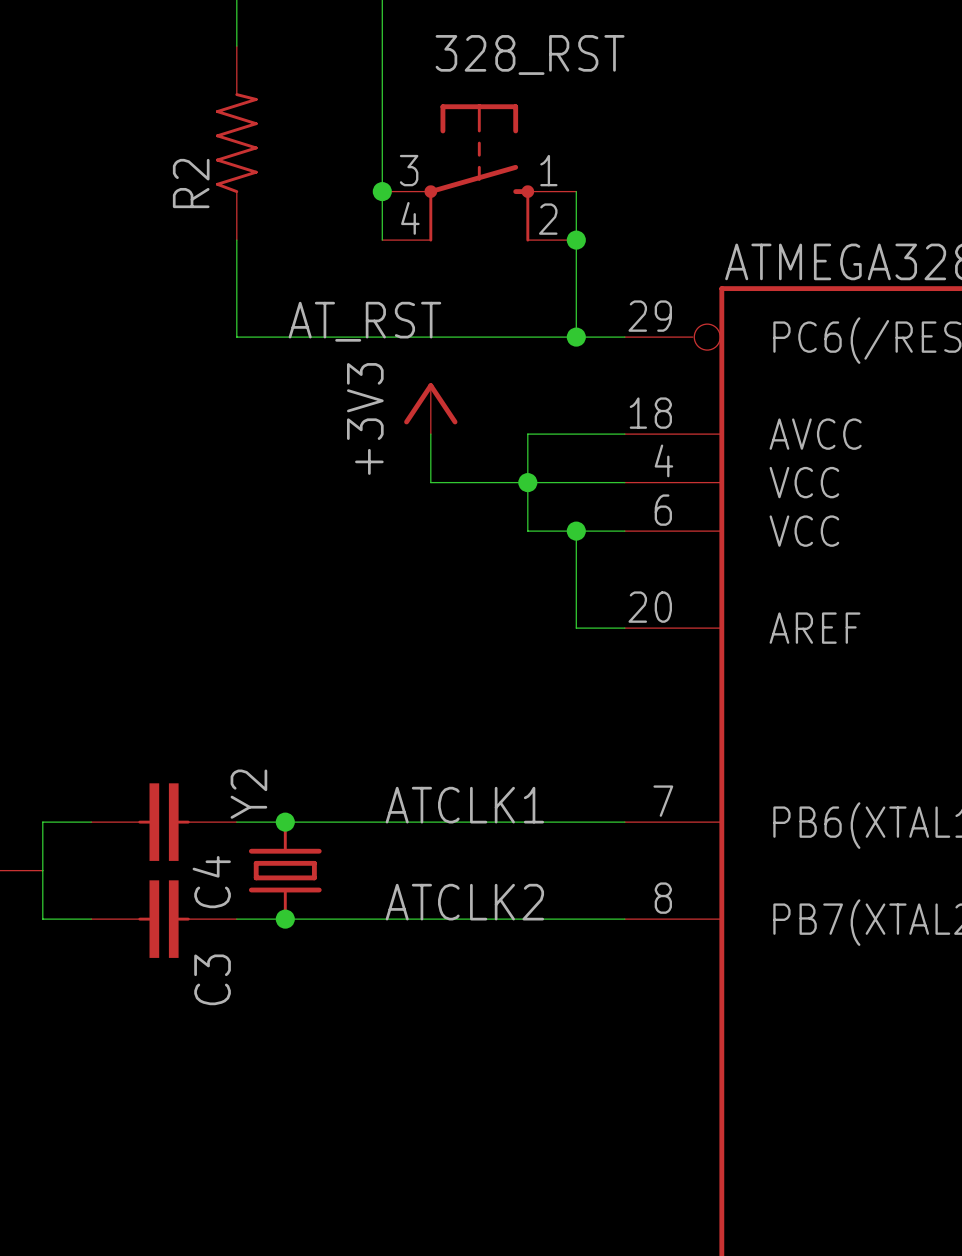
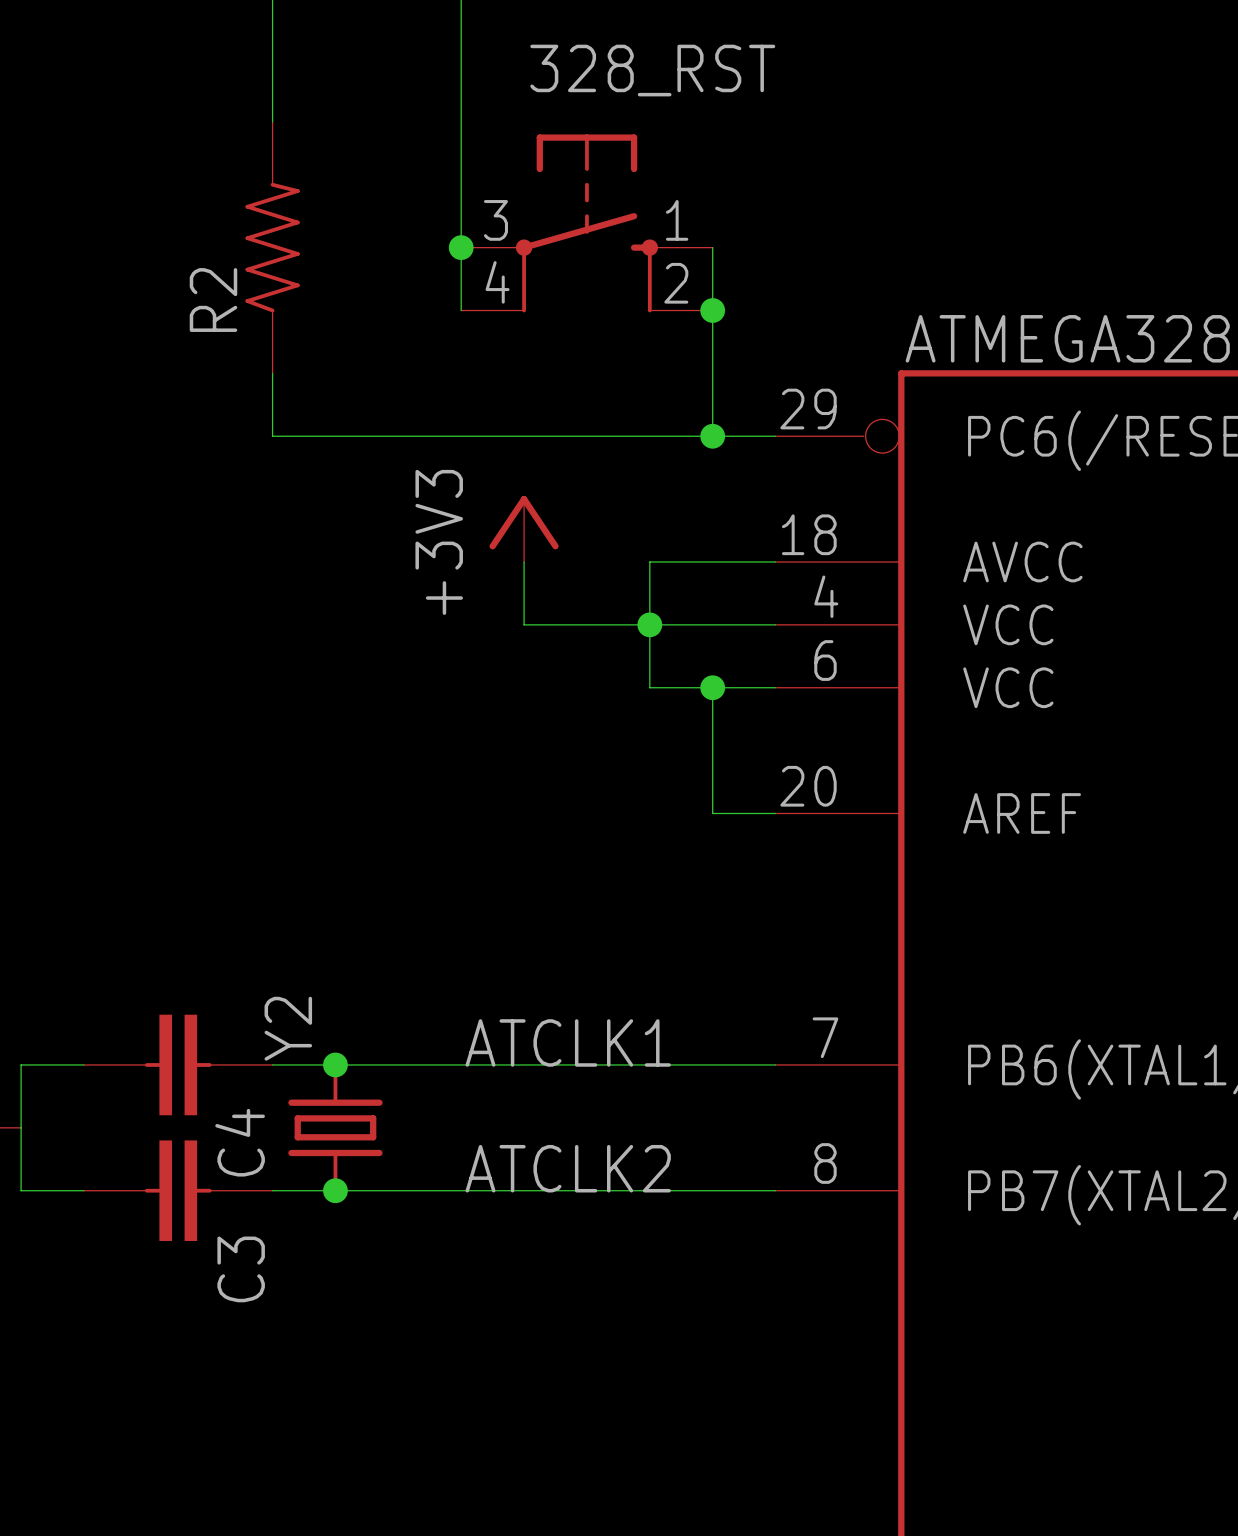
R2 position: (236, 143) -> (272, 247)
label: AT_RST (364, 321) -> none

